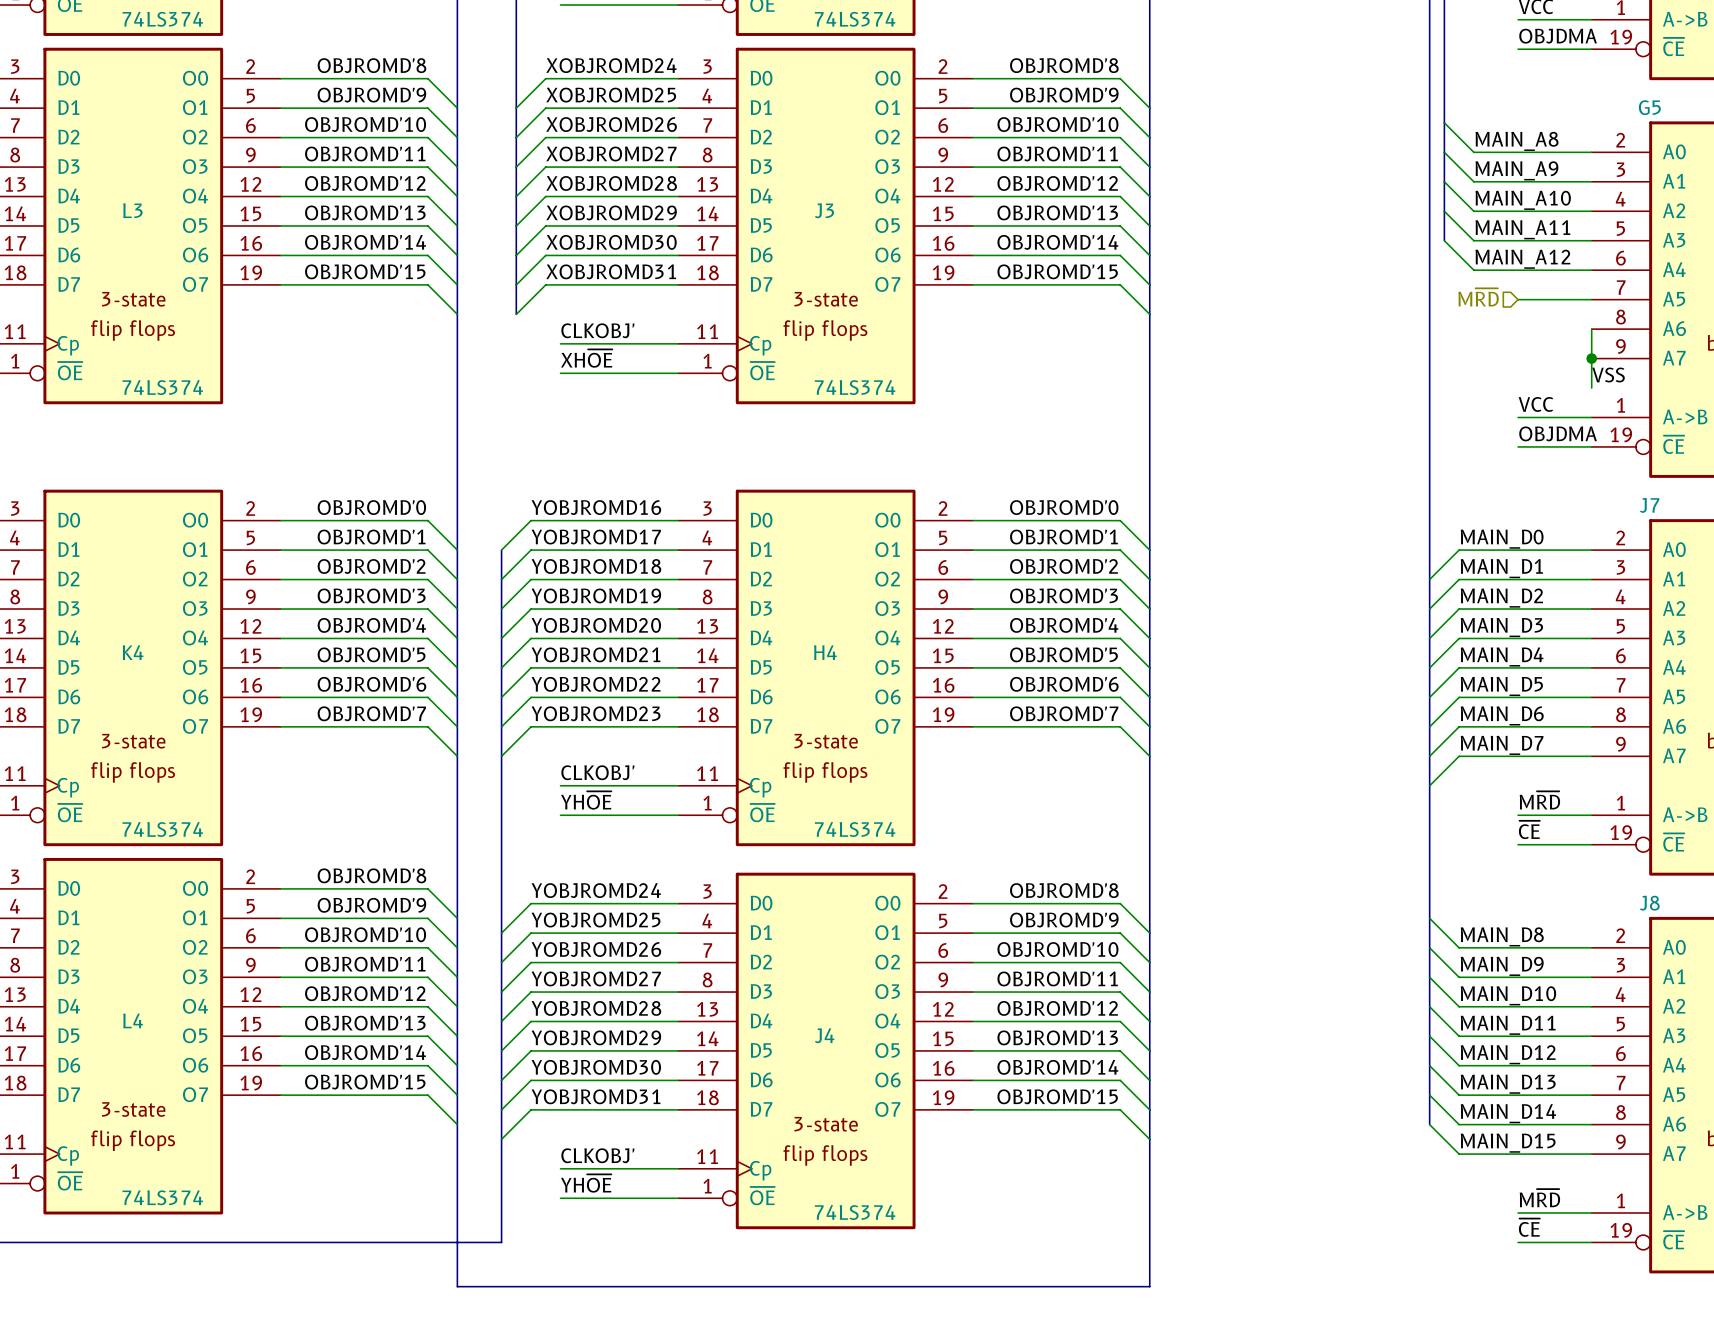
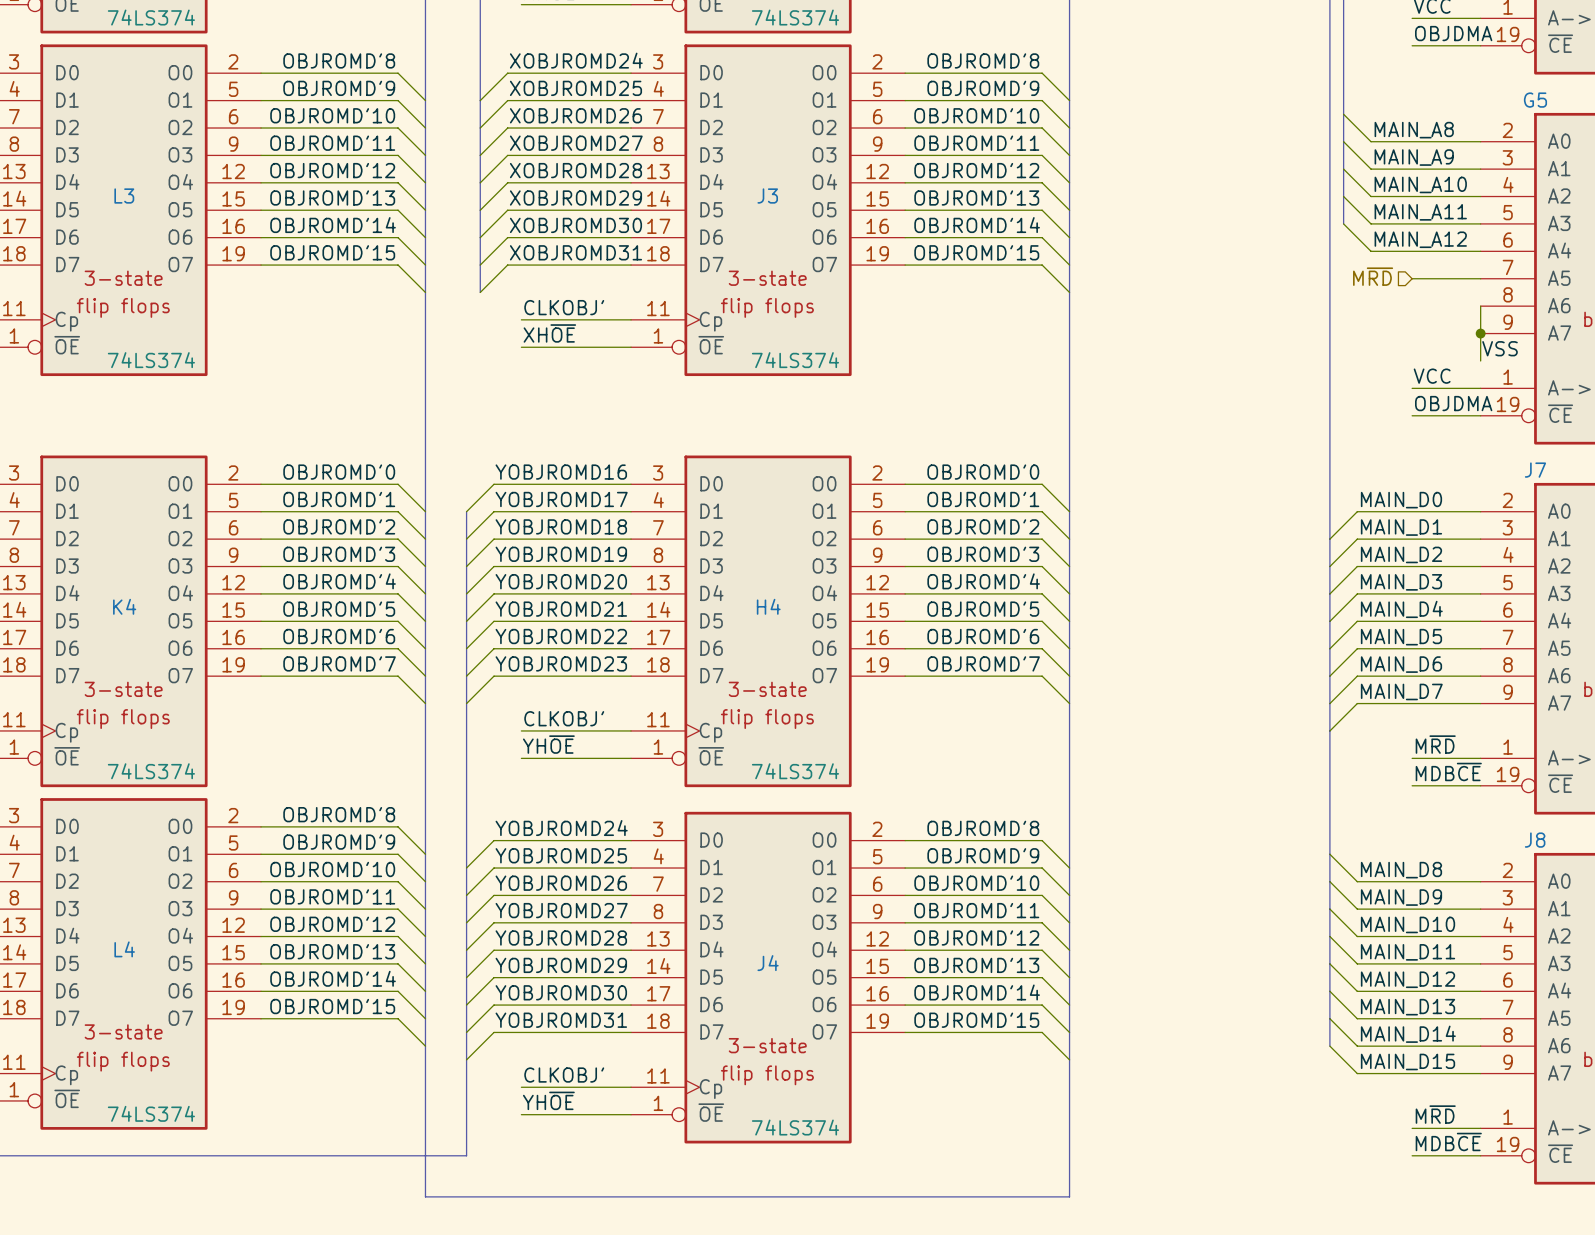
label: ~{CE} (1529, 829) -> MDB~{CE} (1448, 771)
label: ~{CE} (1529, 1227) -> MDB~{CE} (1448, 1141)

